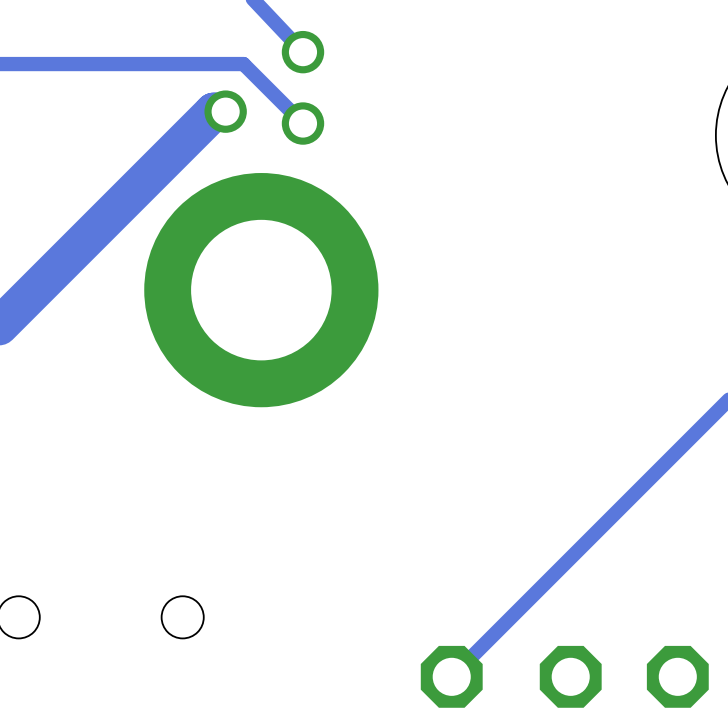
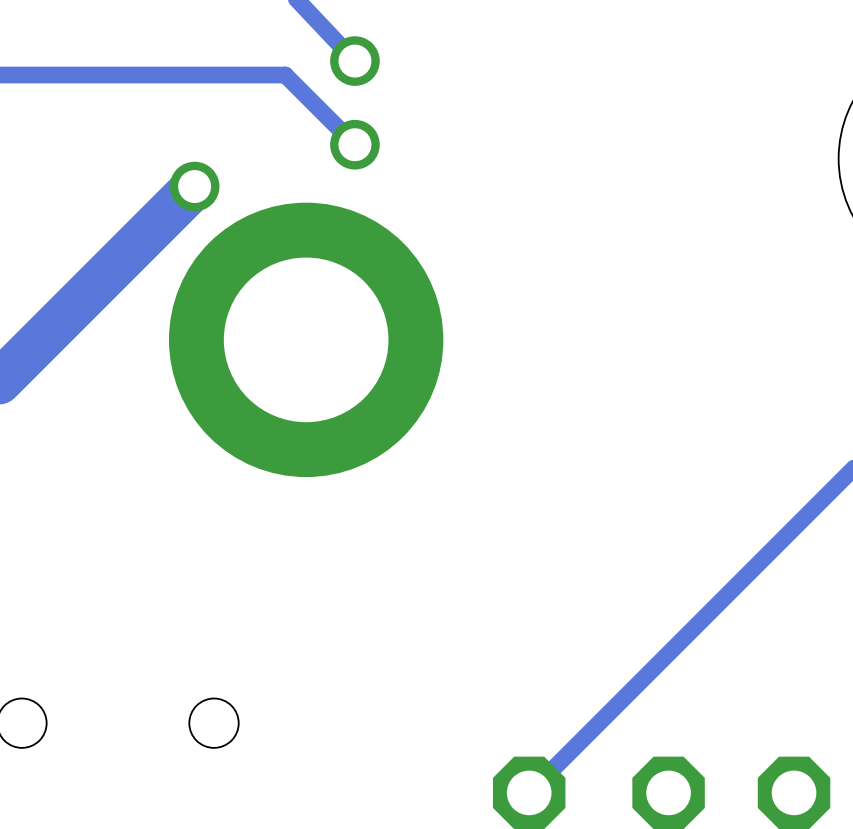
track: (225, 111) (213, 111) (166, 159) -> none
via position: (225, 111) -> (194, 186)

